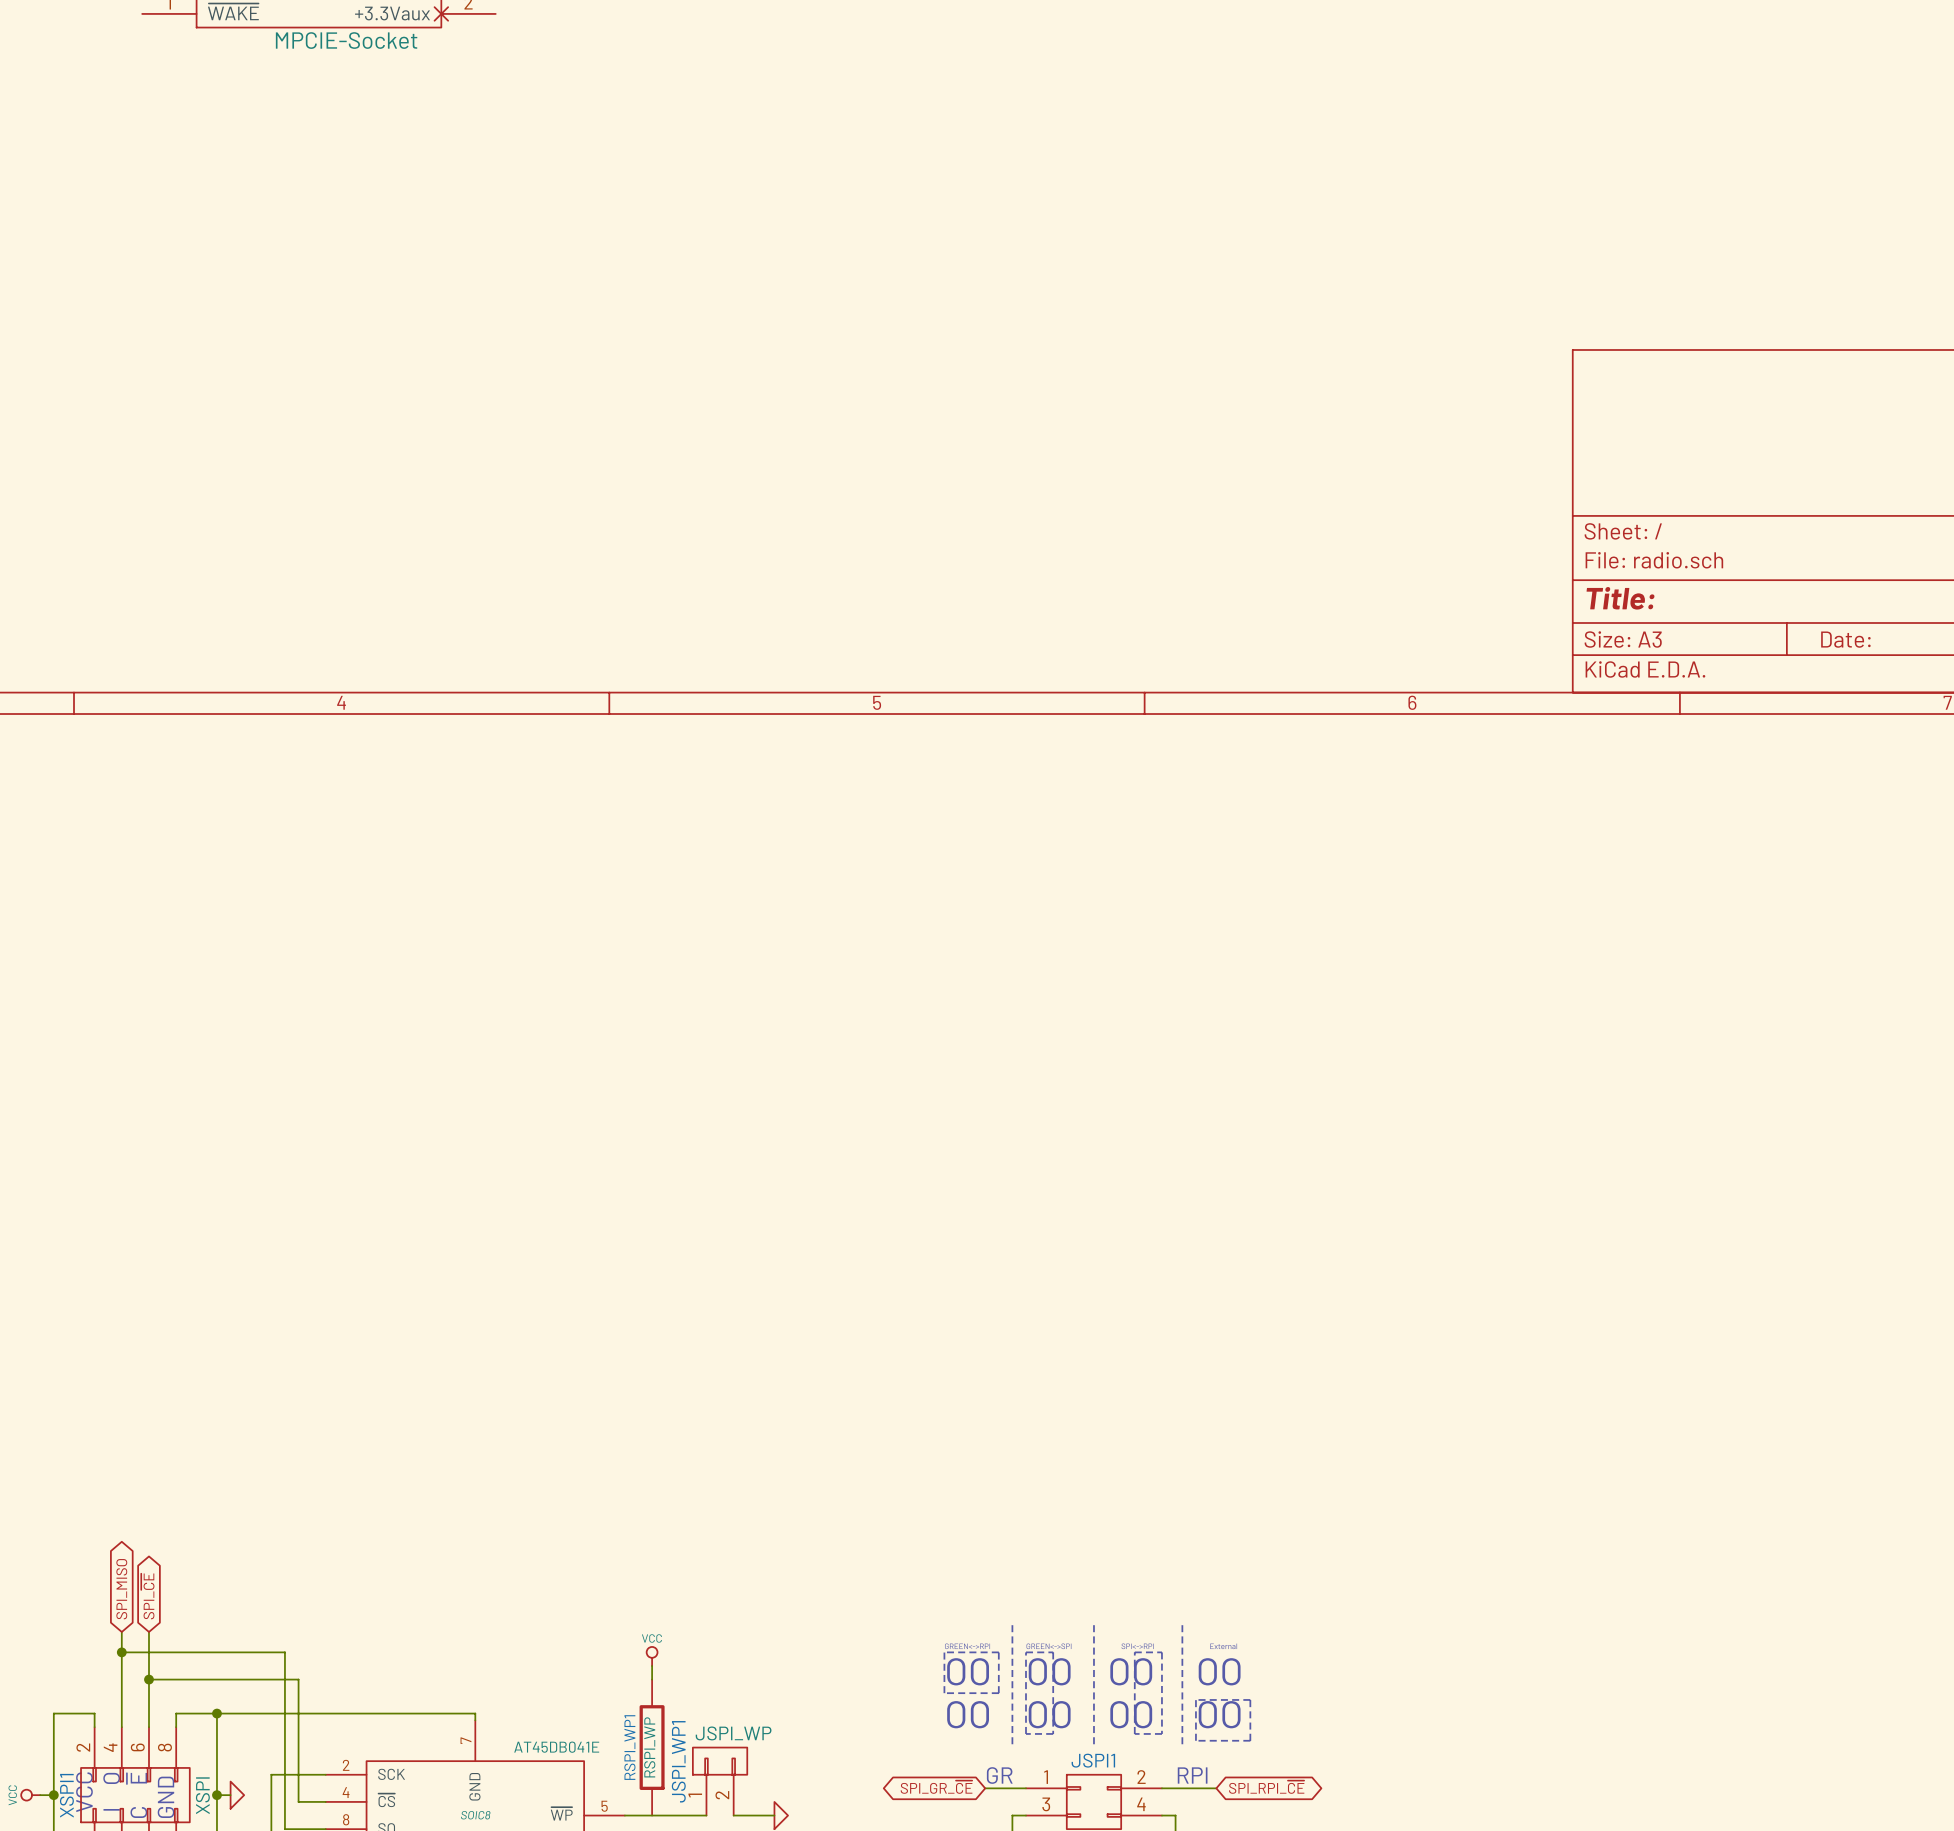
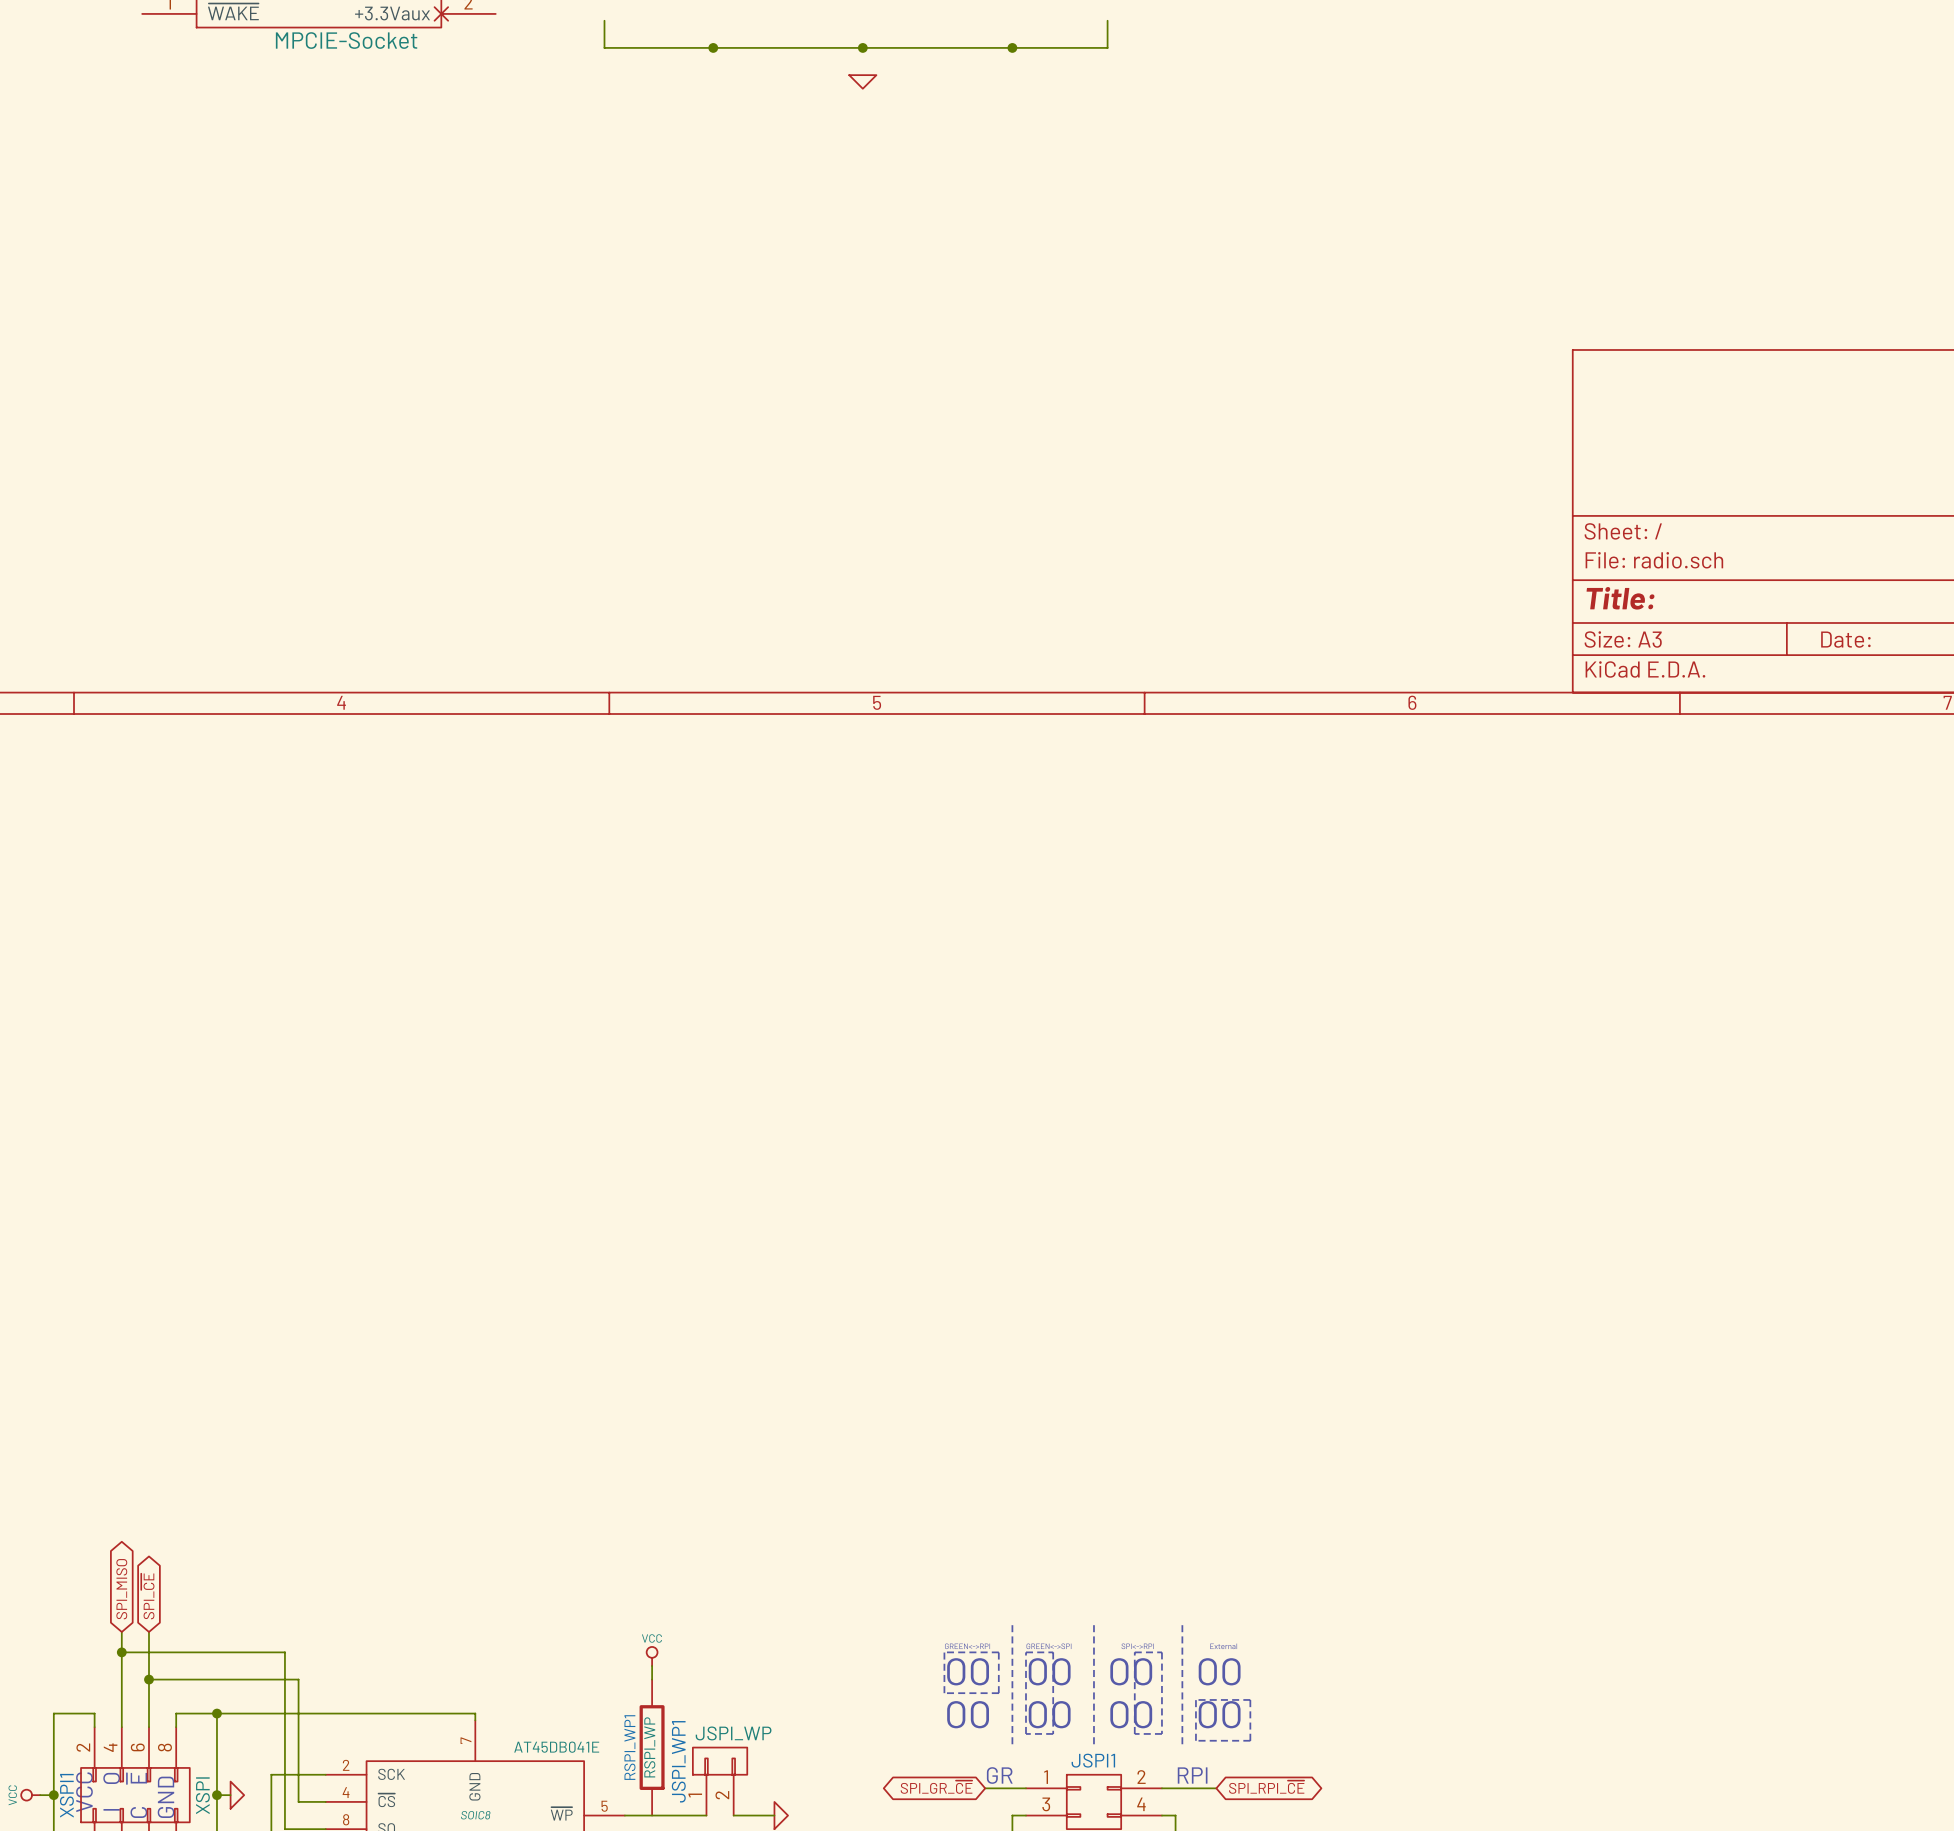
wire: none -> (604, 20) (604, 47) (1107, 47) (1107, 20)
junction: none -> (713, 47)
junction: none -> (862, 47)
junction: none -> (1012, 47)
power symbol: none -> (862, 81)

